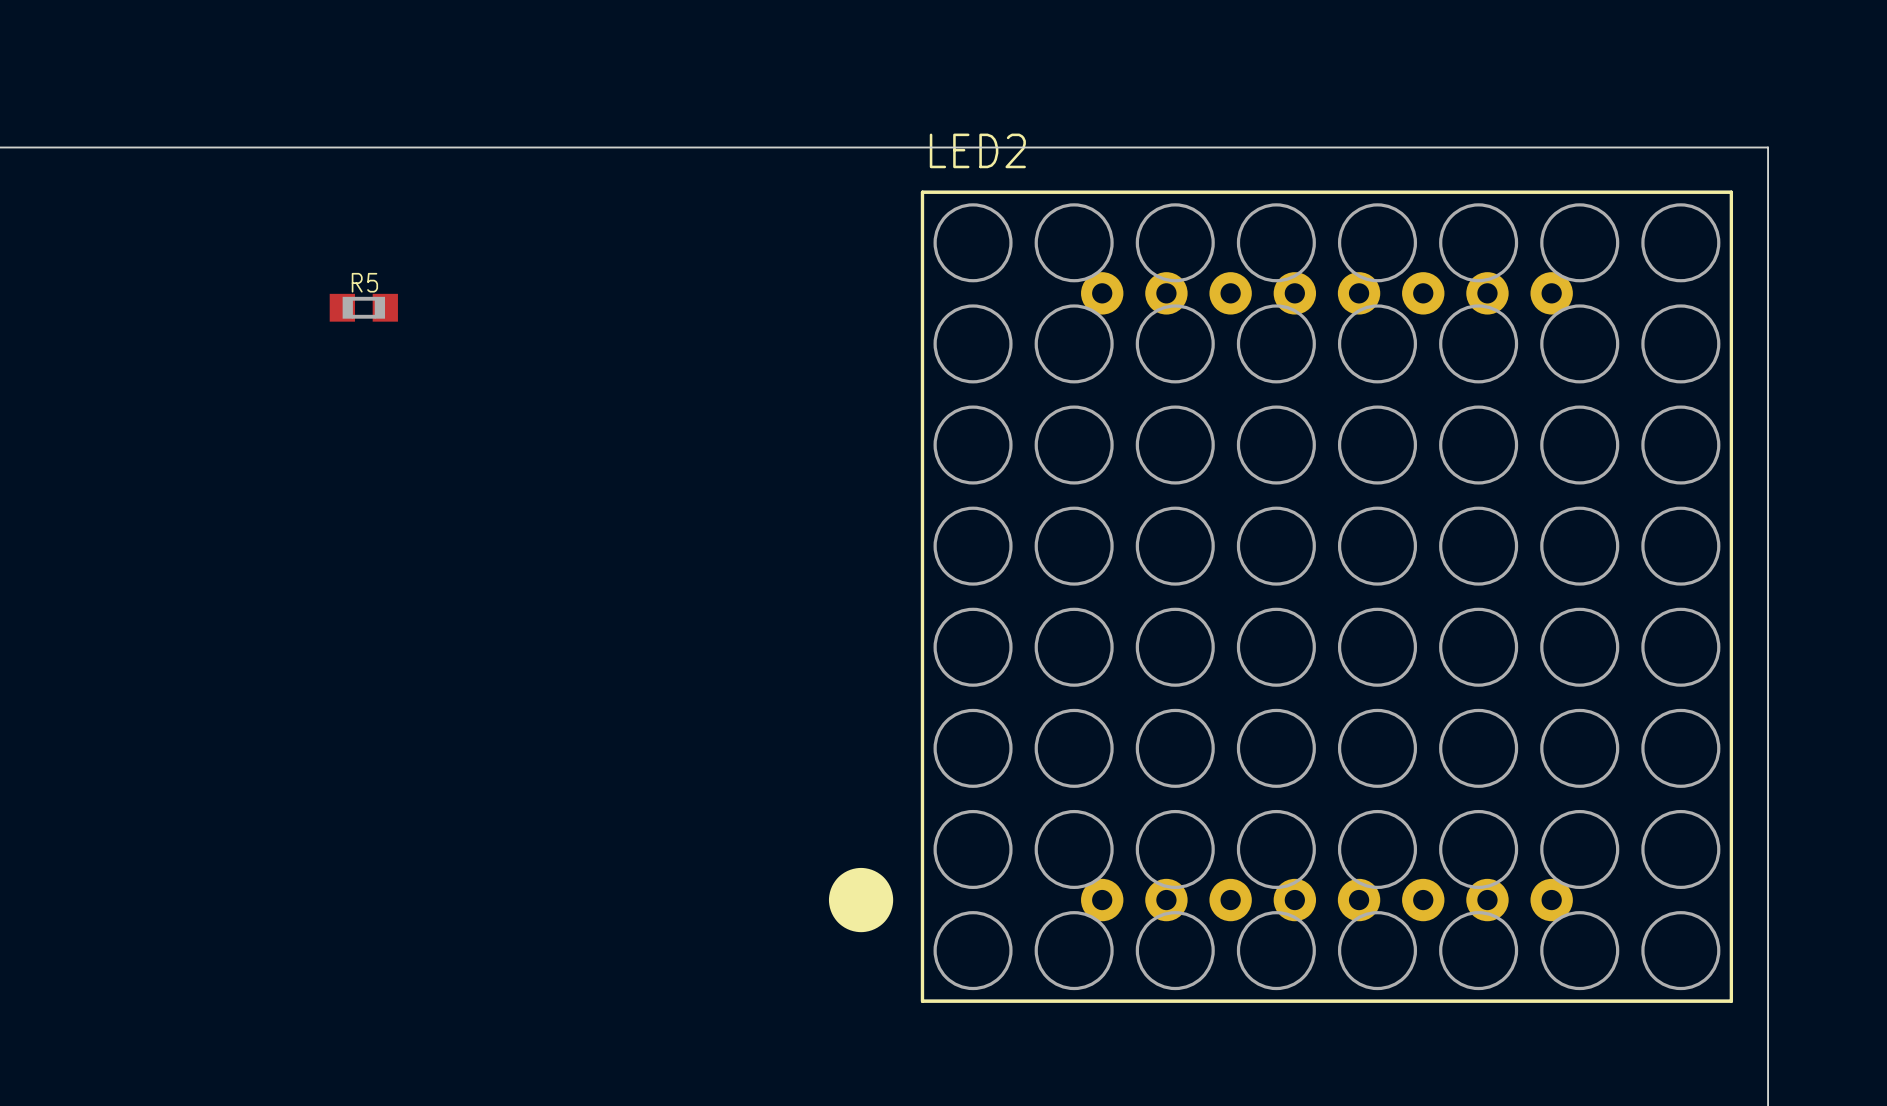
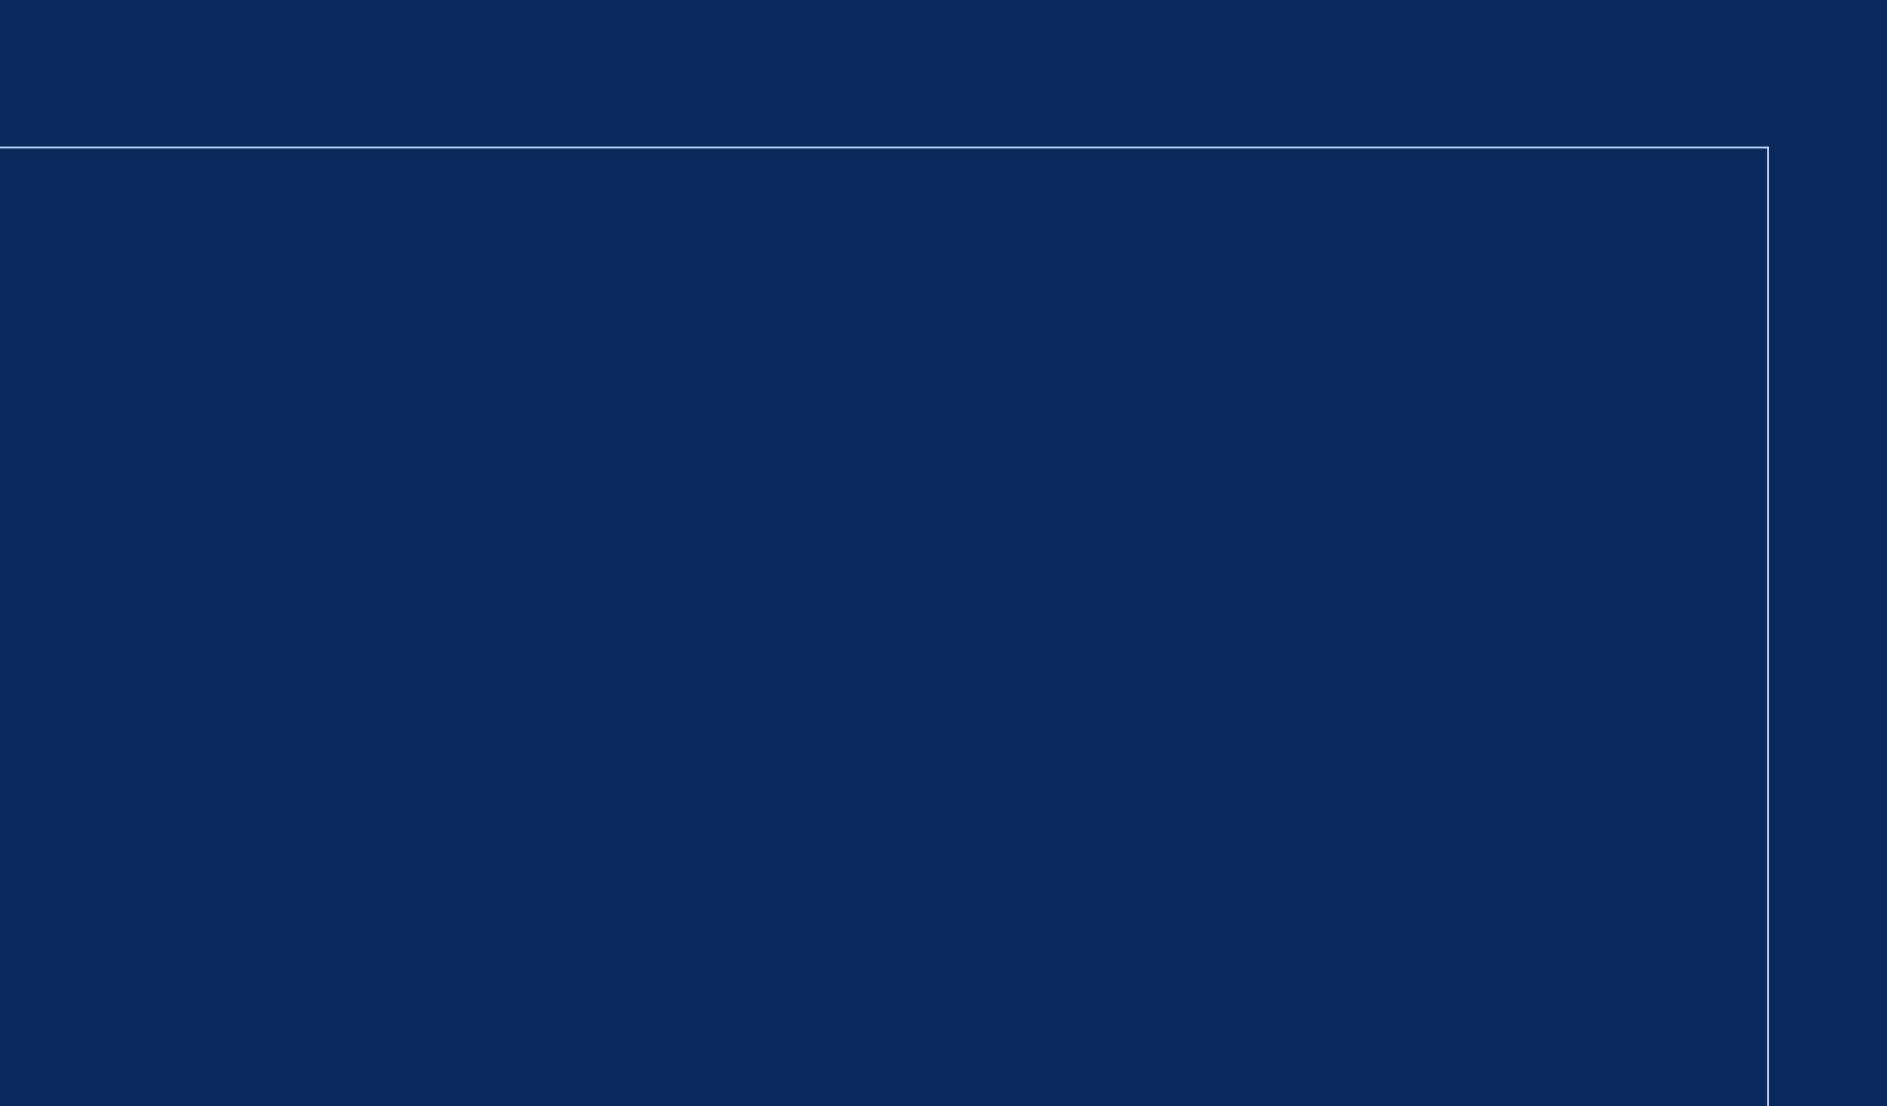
R5: (363, 307) -> none
LED2: (1280, 596) -> none

